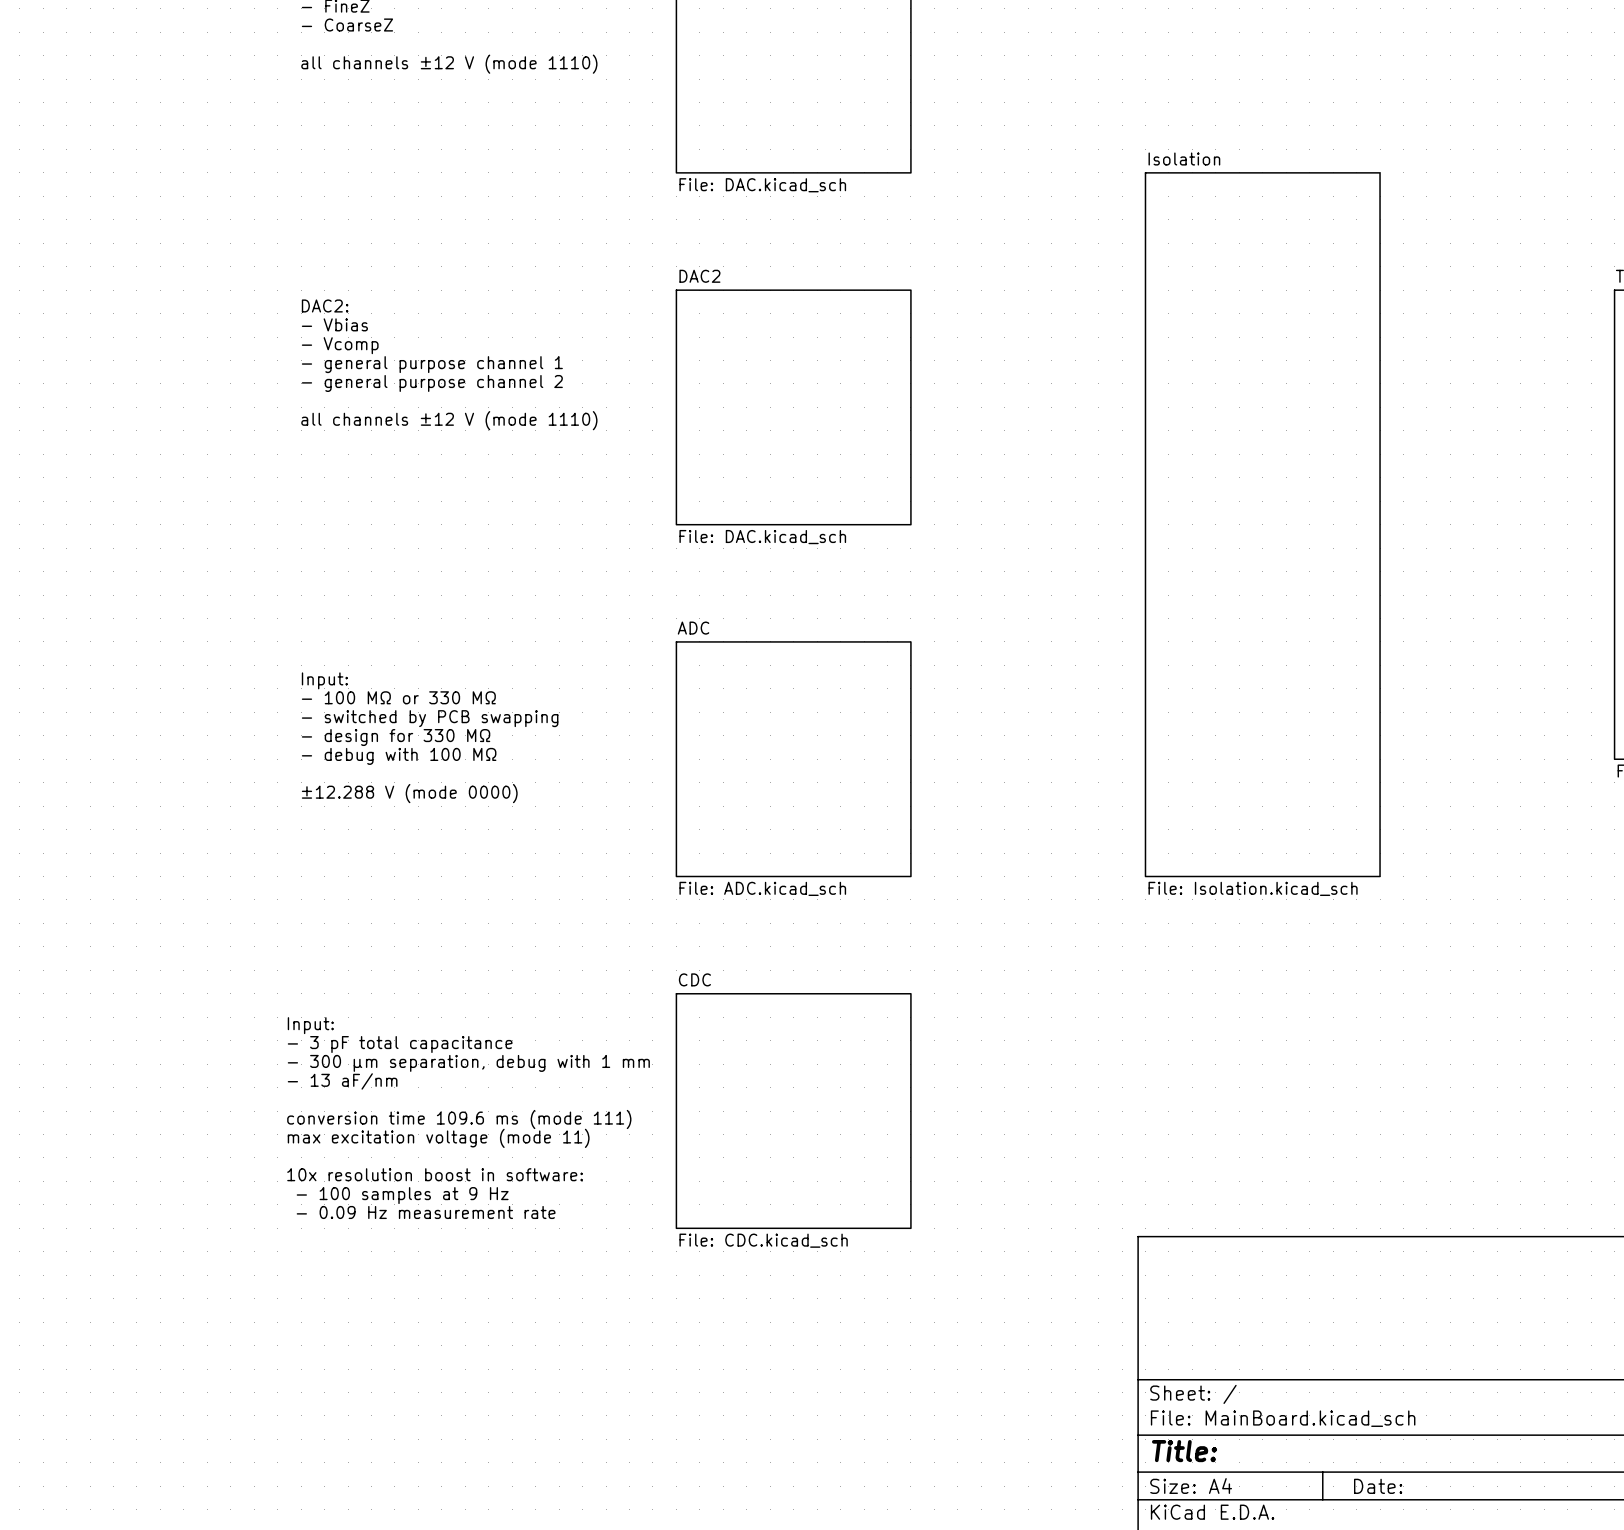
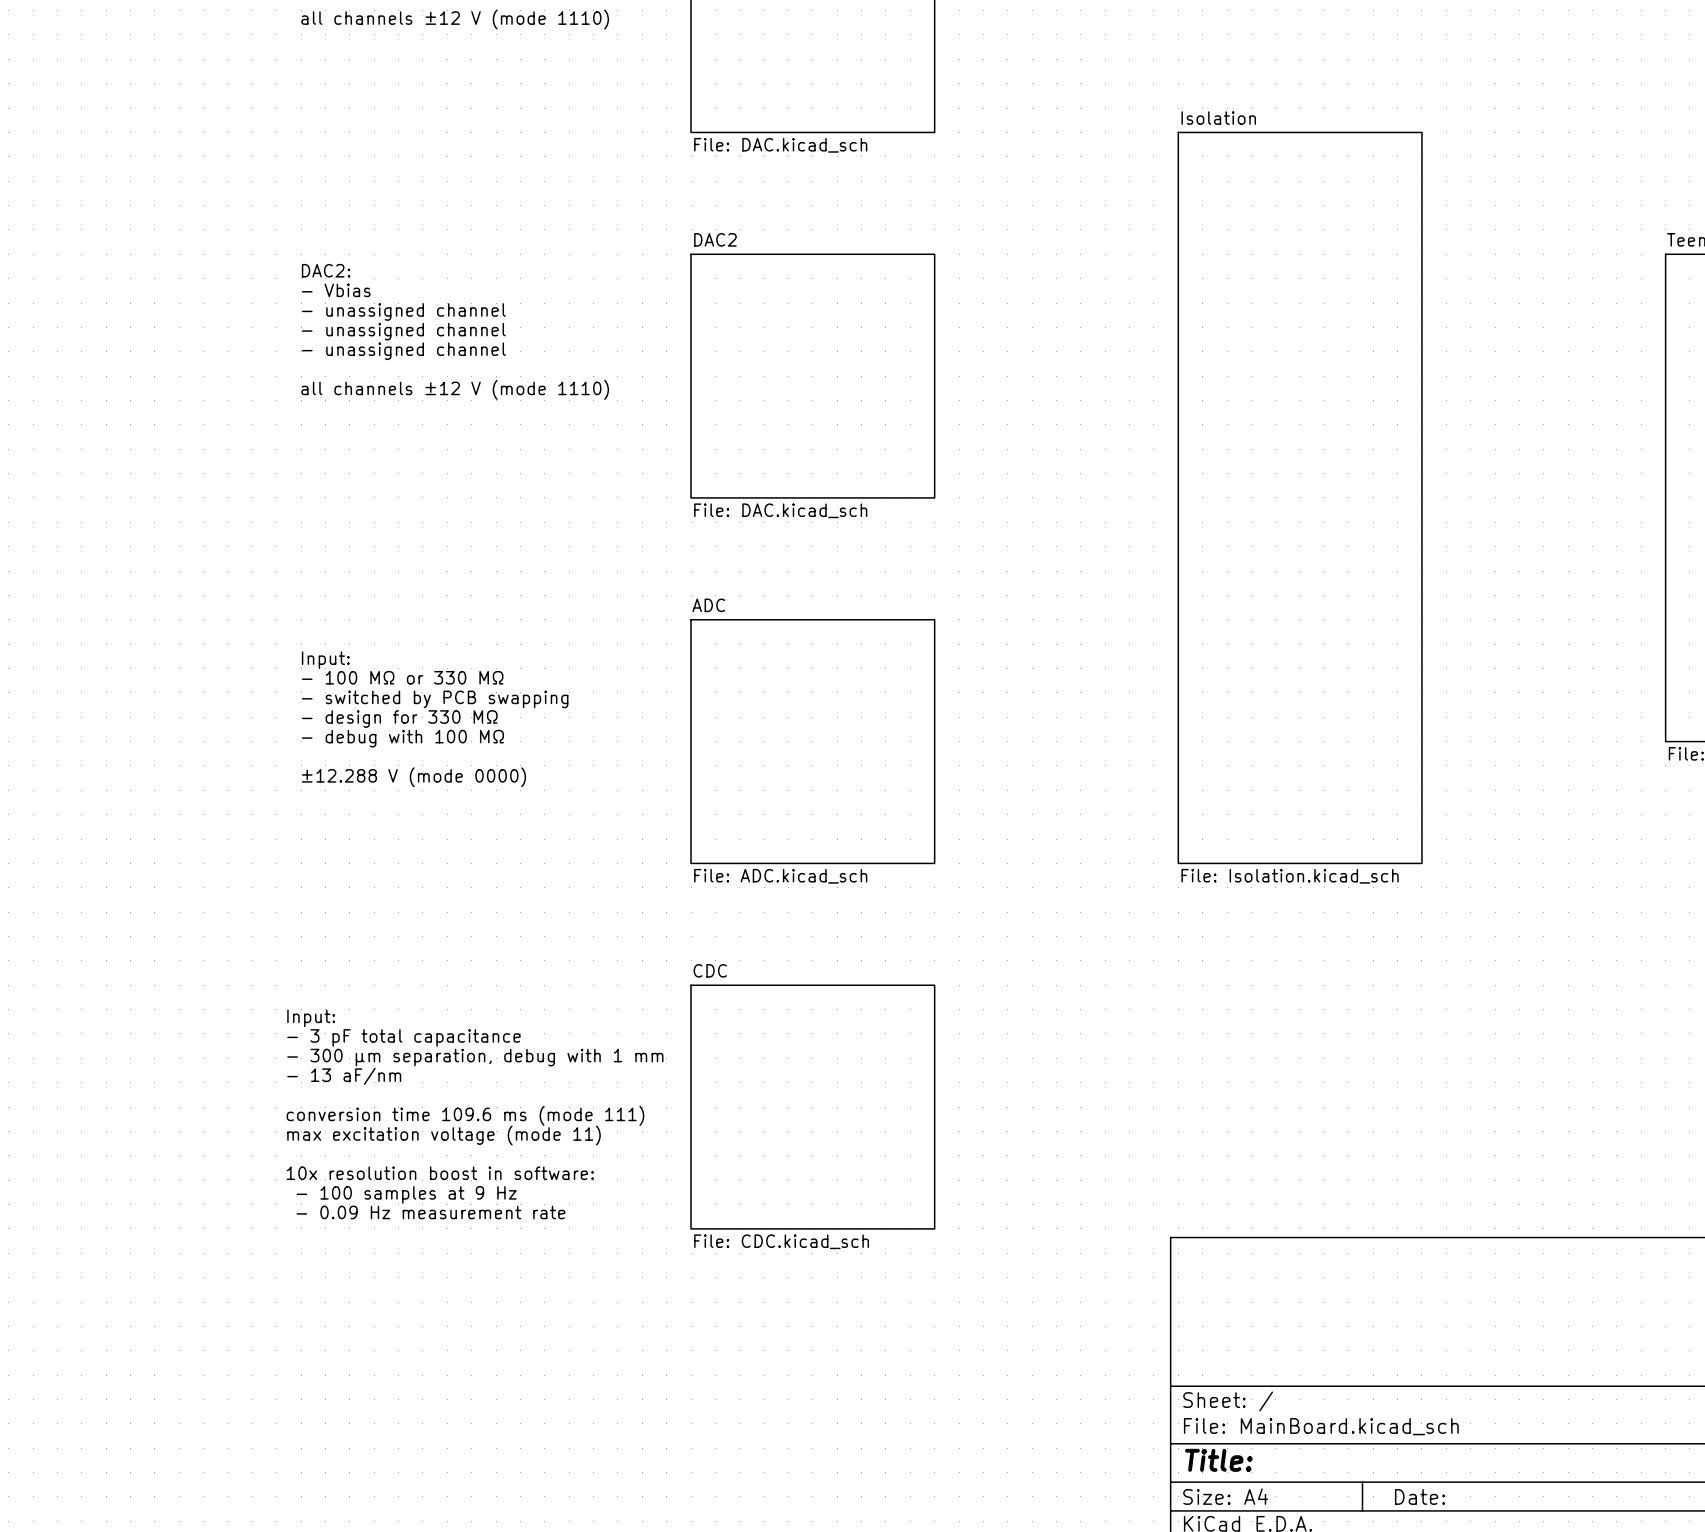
text: - Vcomp (340, 345) -> - unassigned channel (403, 312)
text: - general purpose channel 1 (432, 364) -> - unassigned channel (403, 331)
text: - general purpose channel 2 (432, 383) -> - unassigned channel (403, 351)

